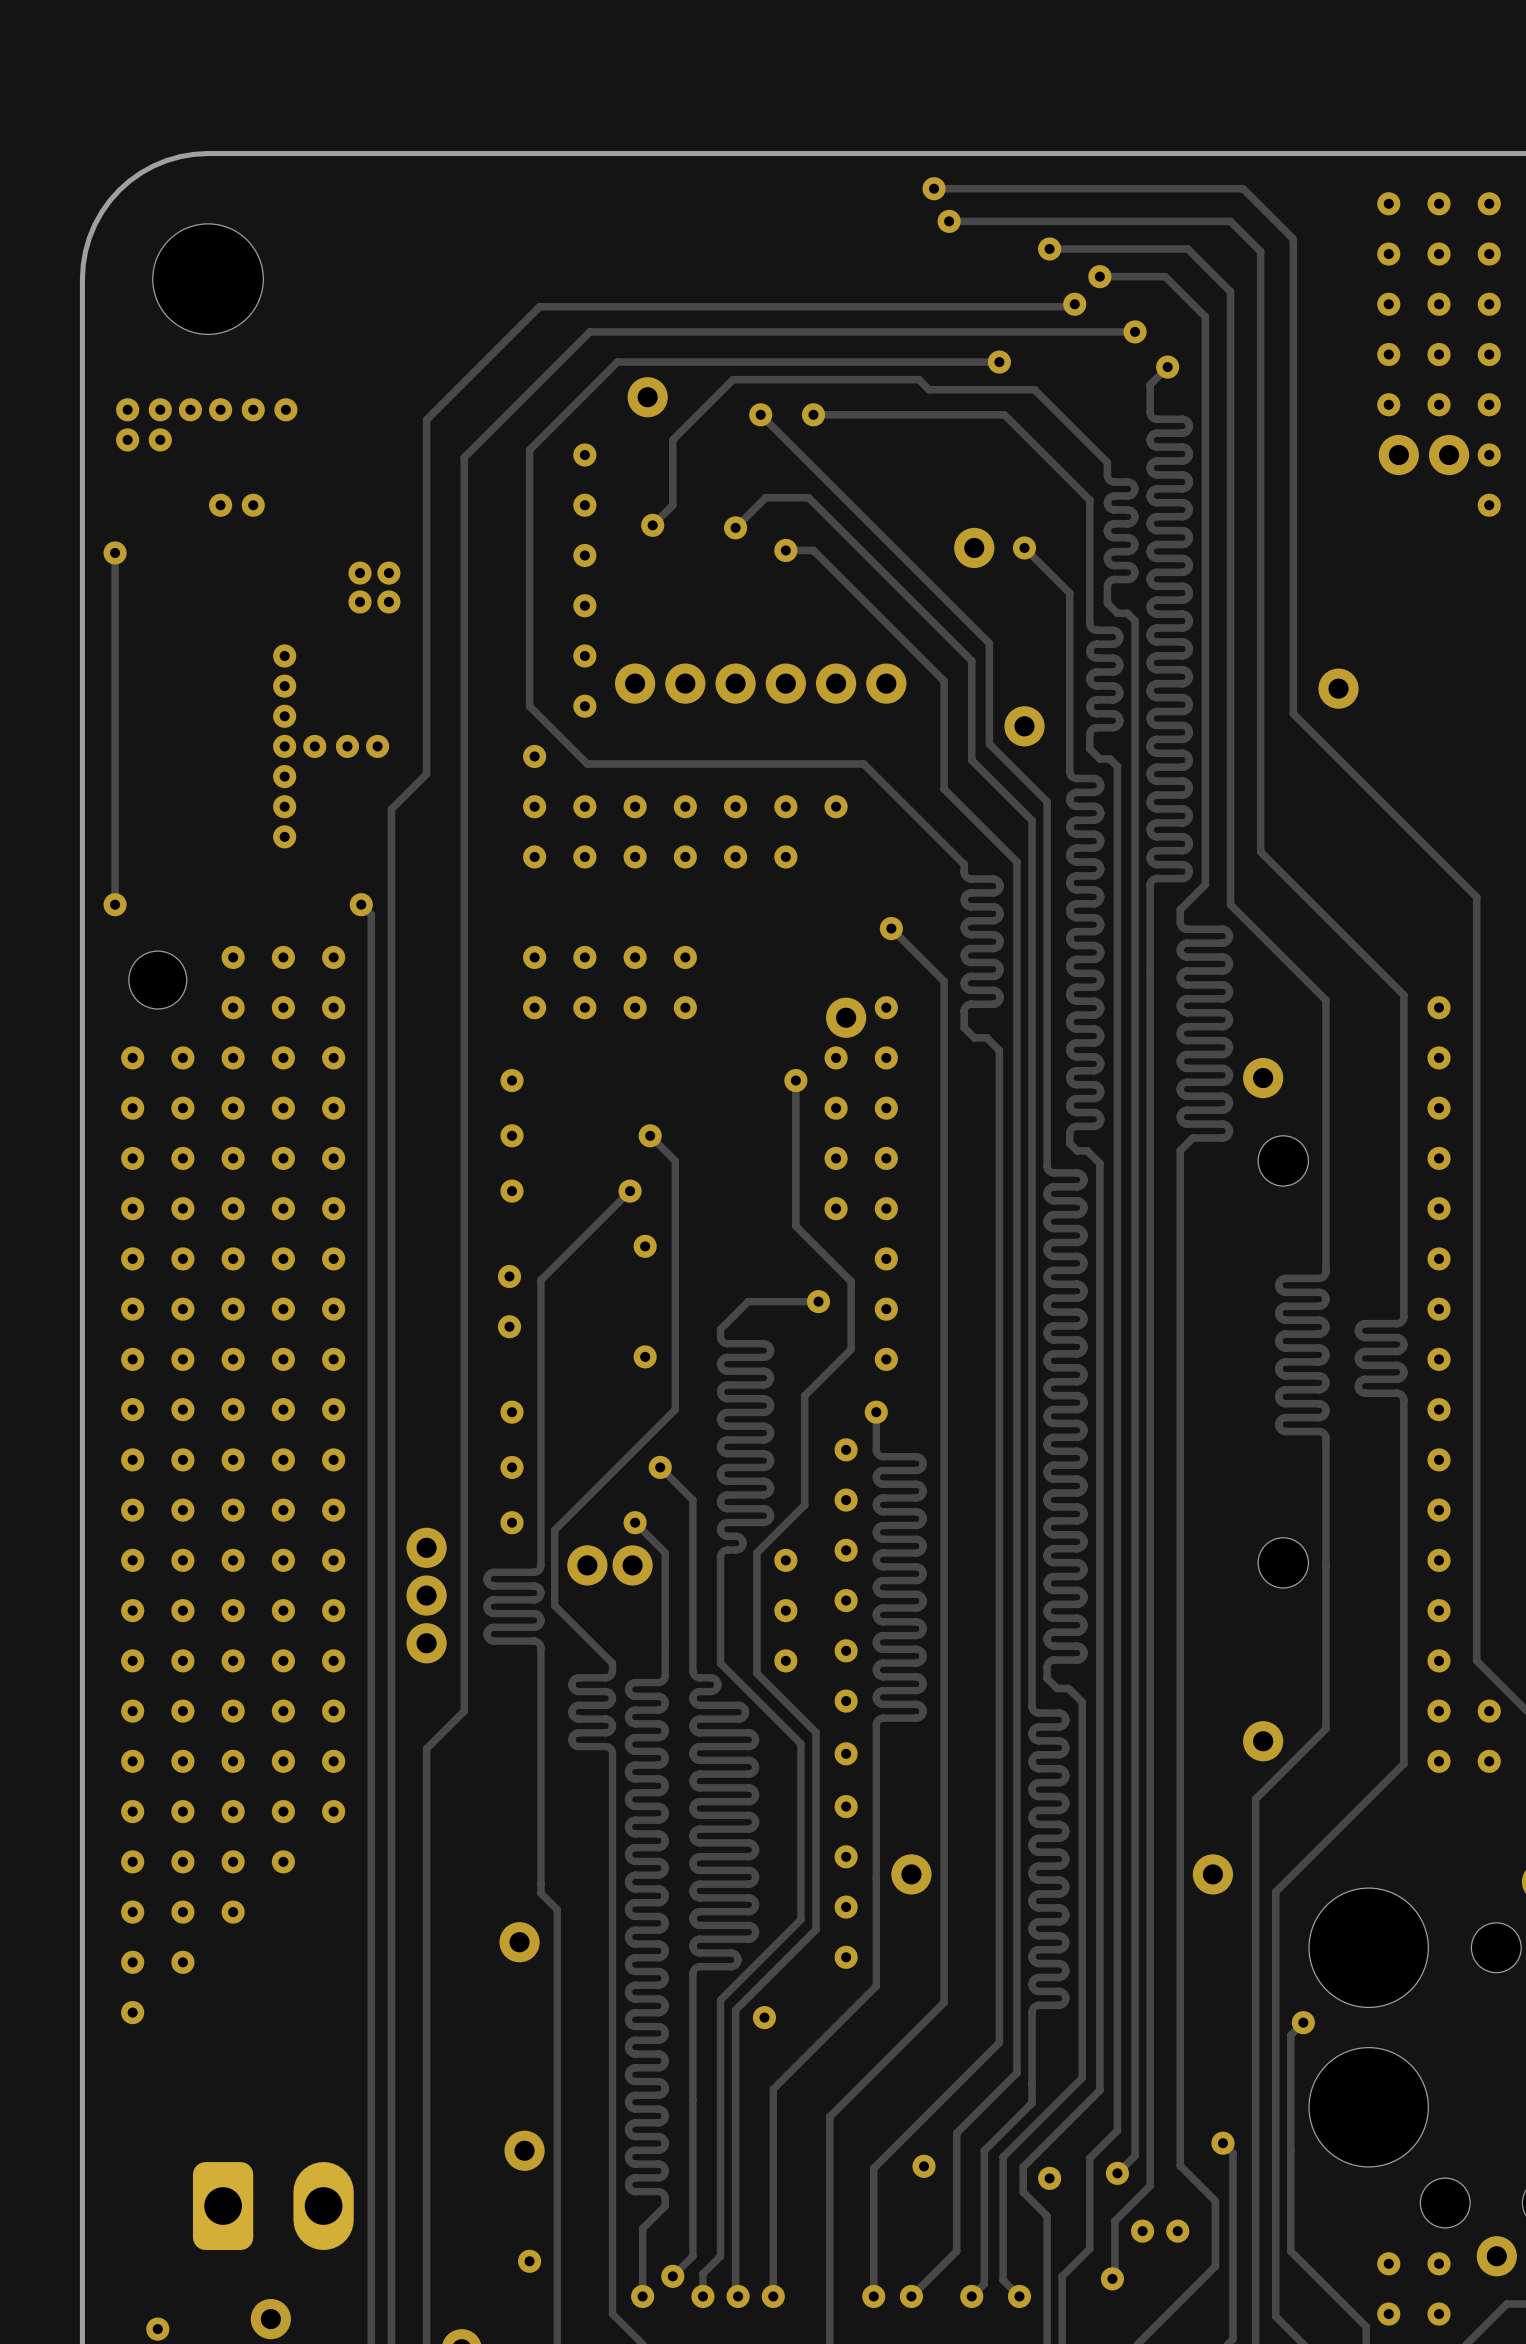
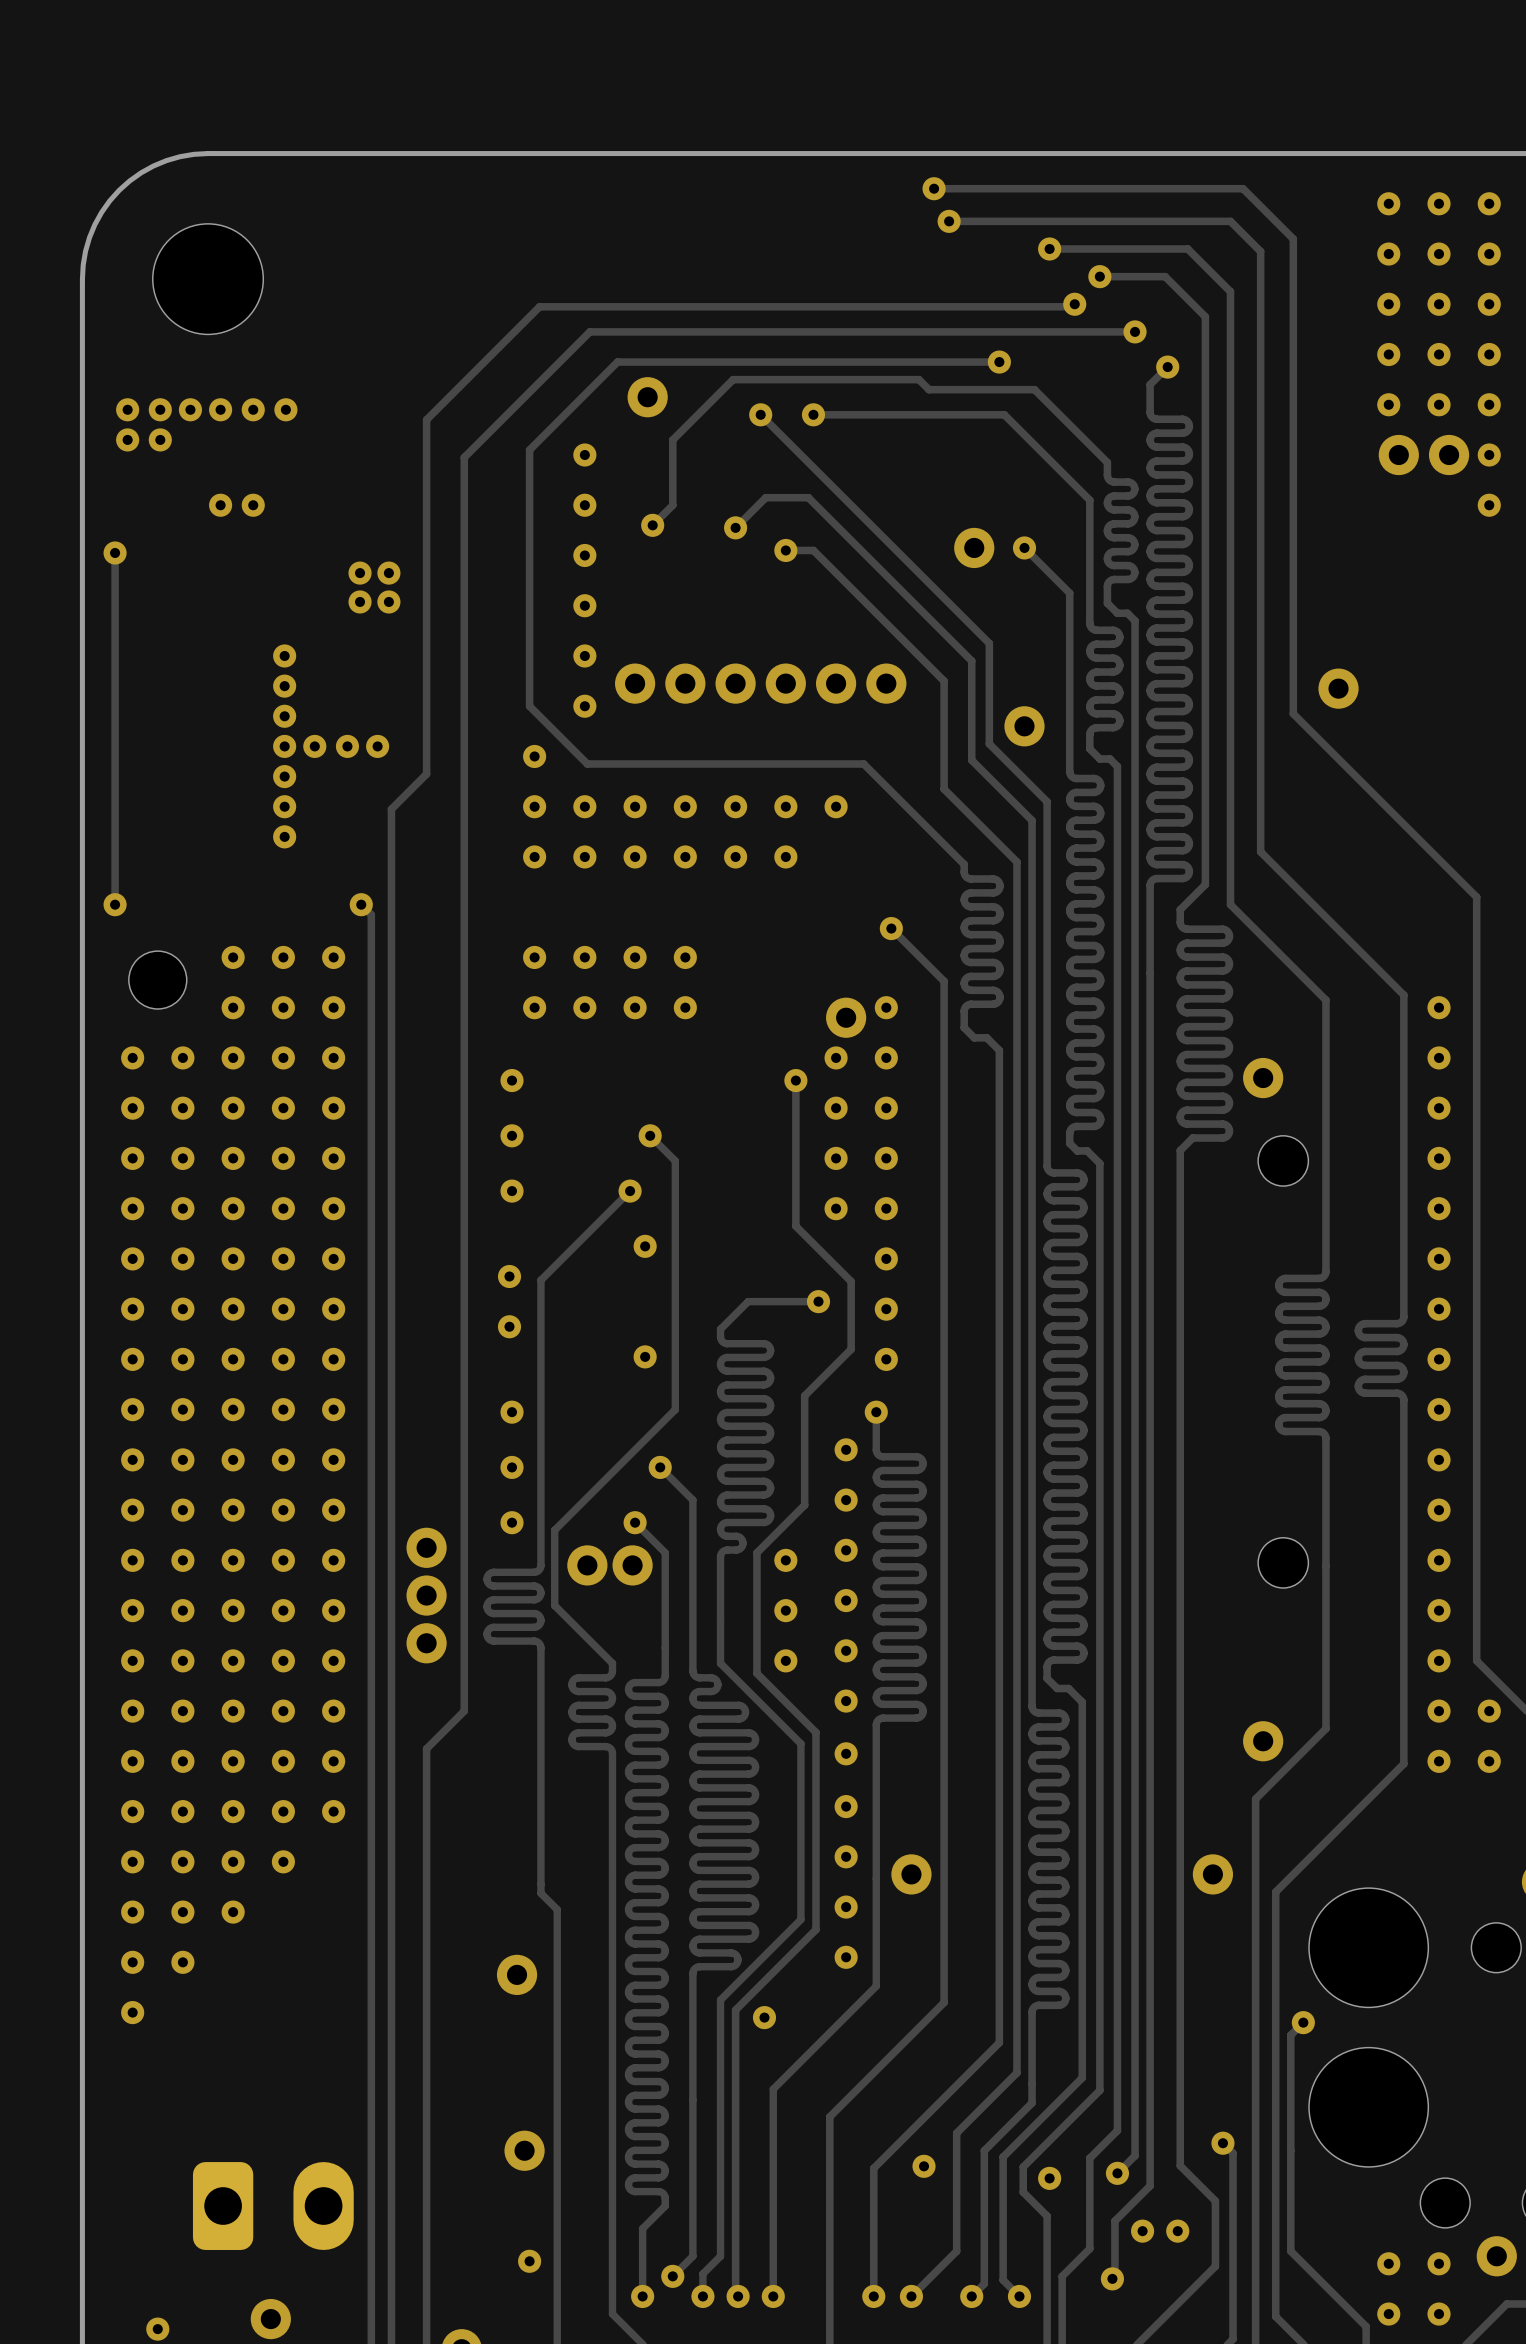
via position: (519, 1942) -> (517, 1974)

